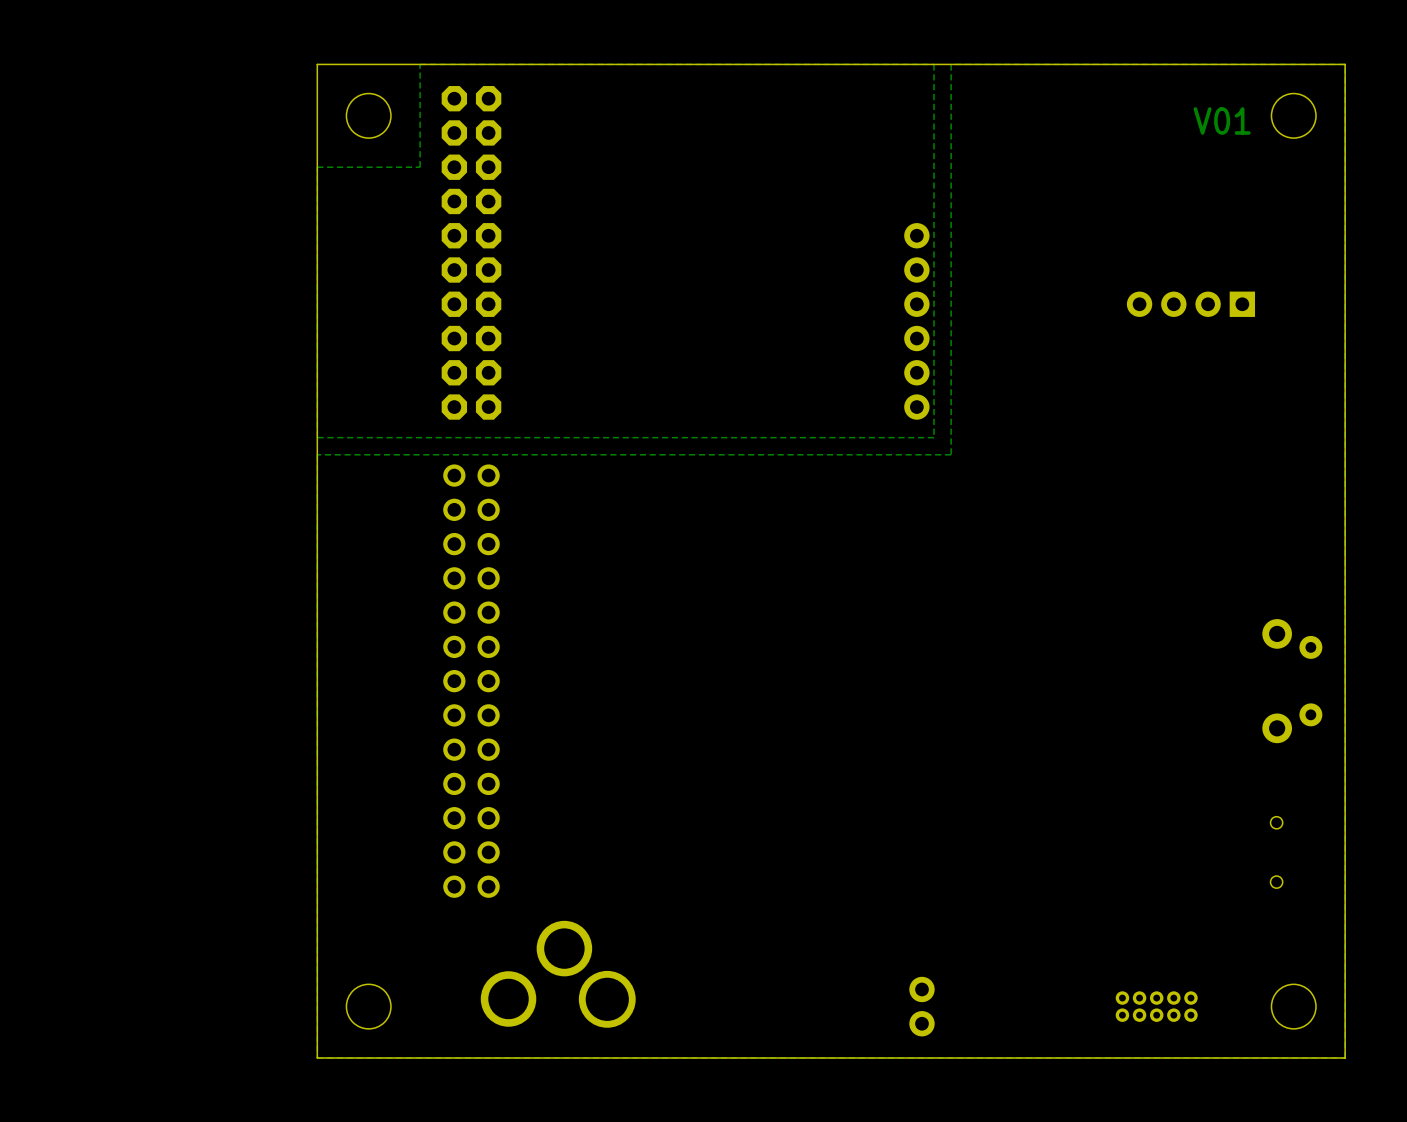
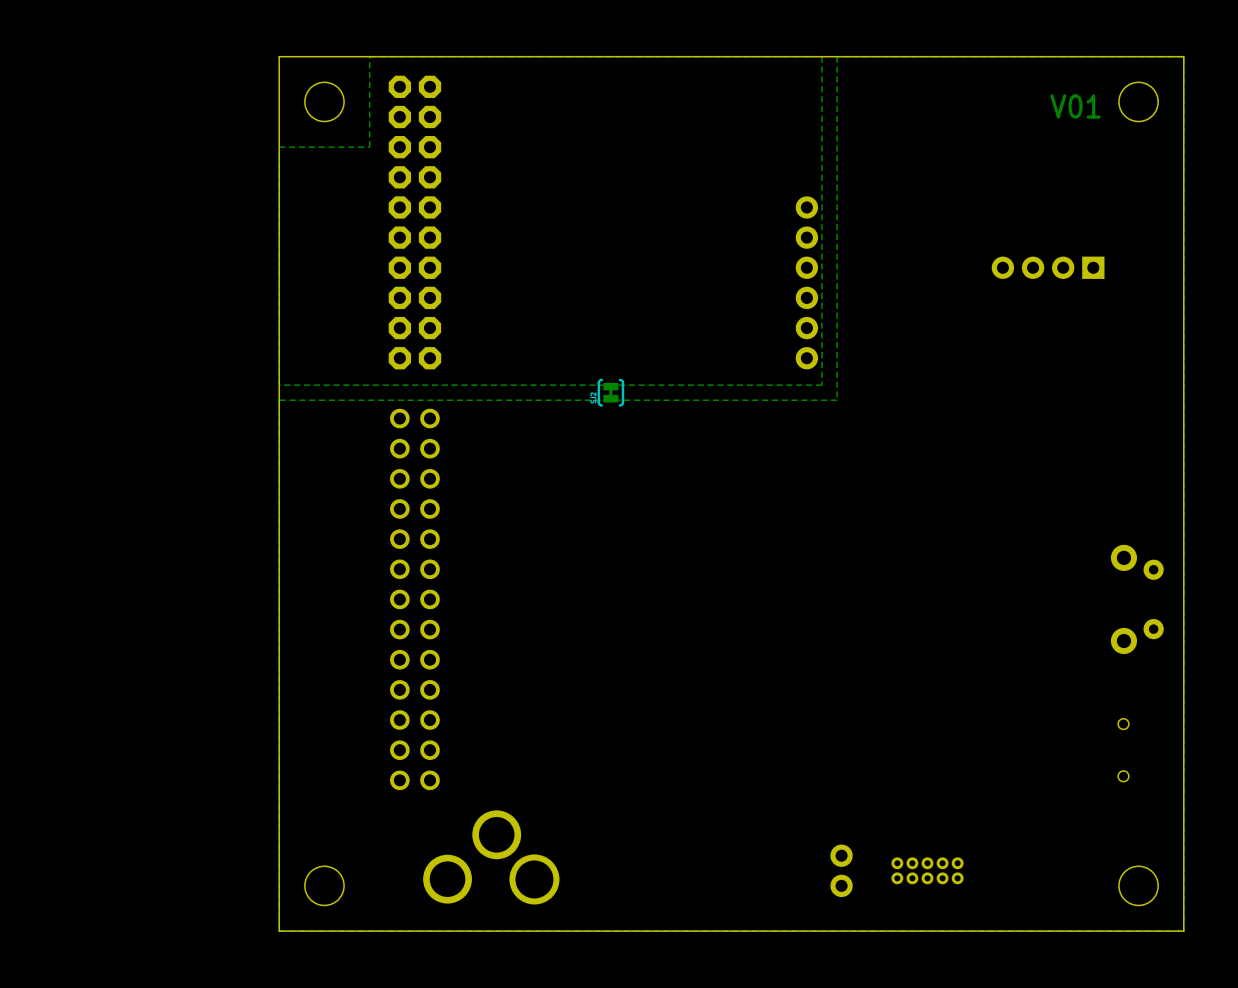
part: none -> (610, 392)
part position: (922, 1006) -> (841, 870)
part position: (1156, 1006) -> (927, 870)

